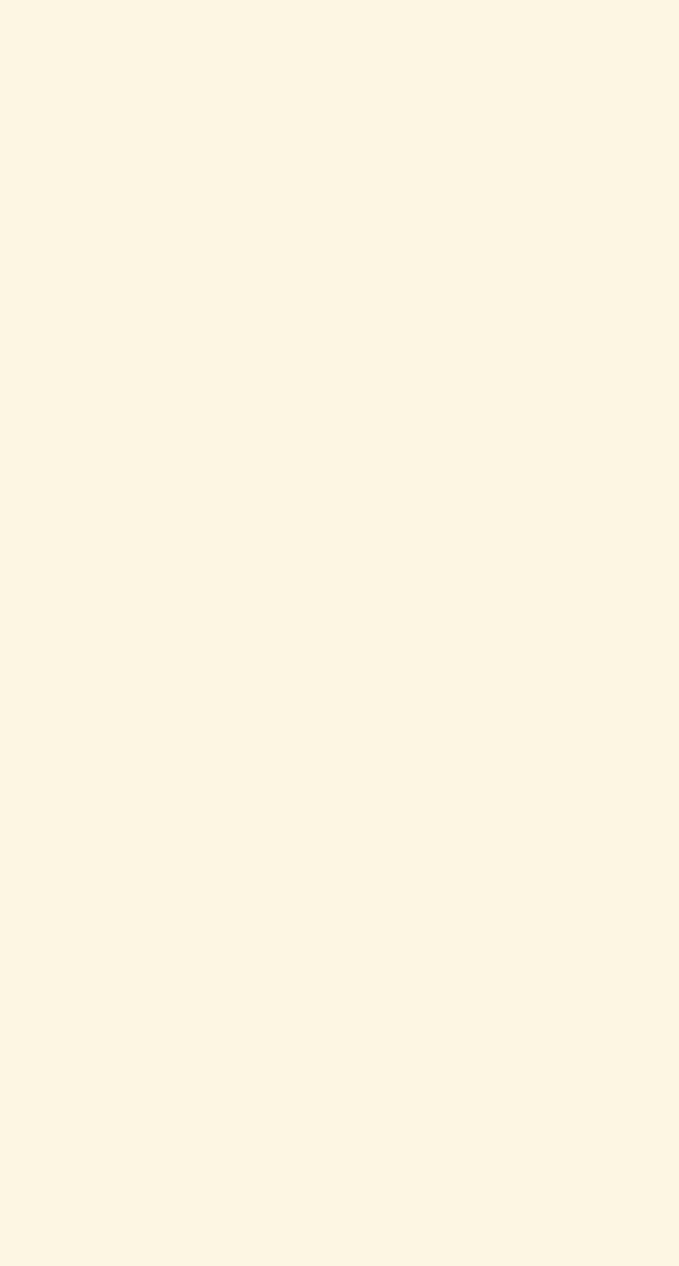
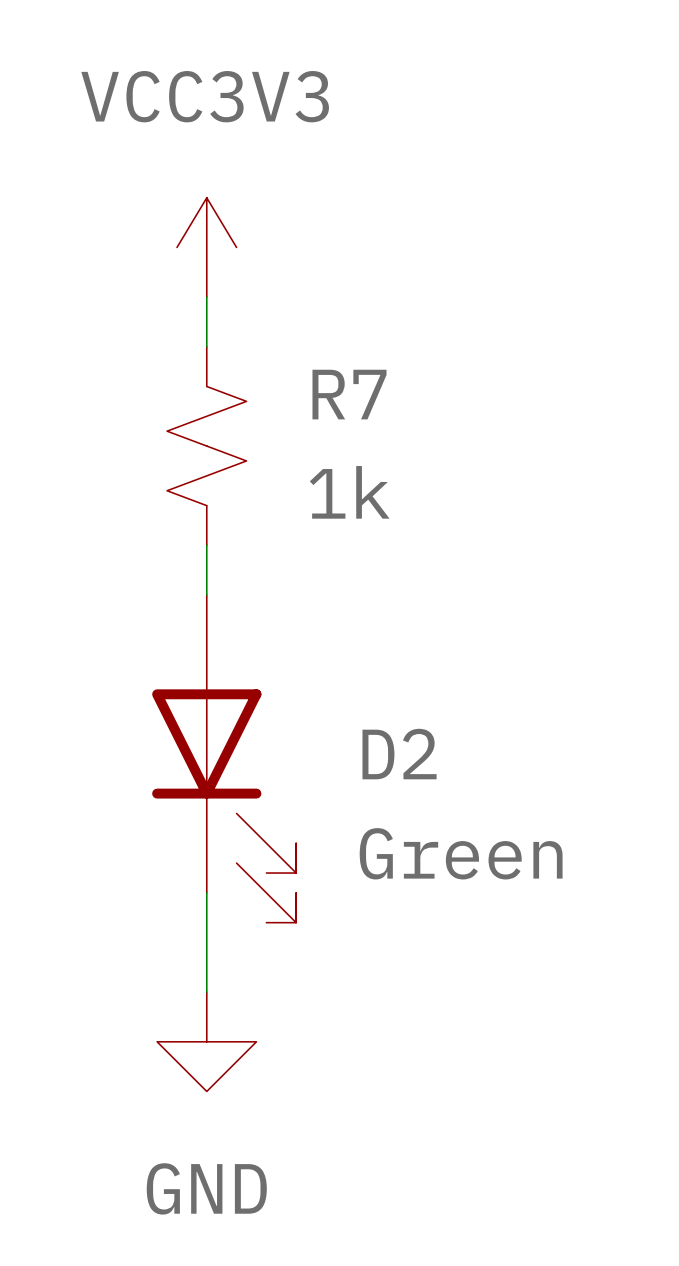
power symbol: none -> VCC3V3 (206, 247)
wire: none -> (206, 297) (206, 346)
R7: none -> 1k (206, 446)
wire: none -> (206, 545) (206, 595)
D2: none -> Green (224, 758)
wire: none -> (206, 892) (206, 992)
power symbol: none -> GND (206, 1041)

